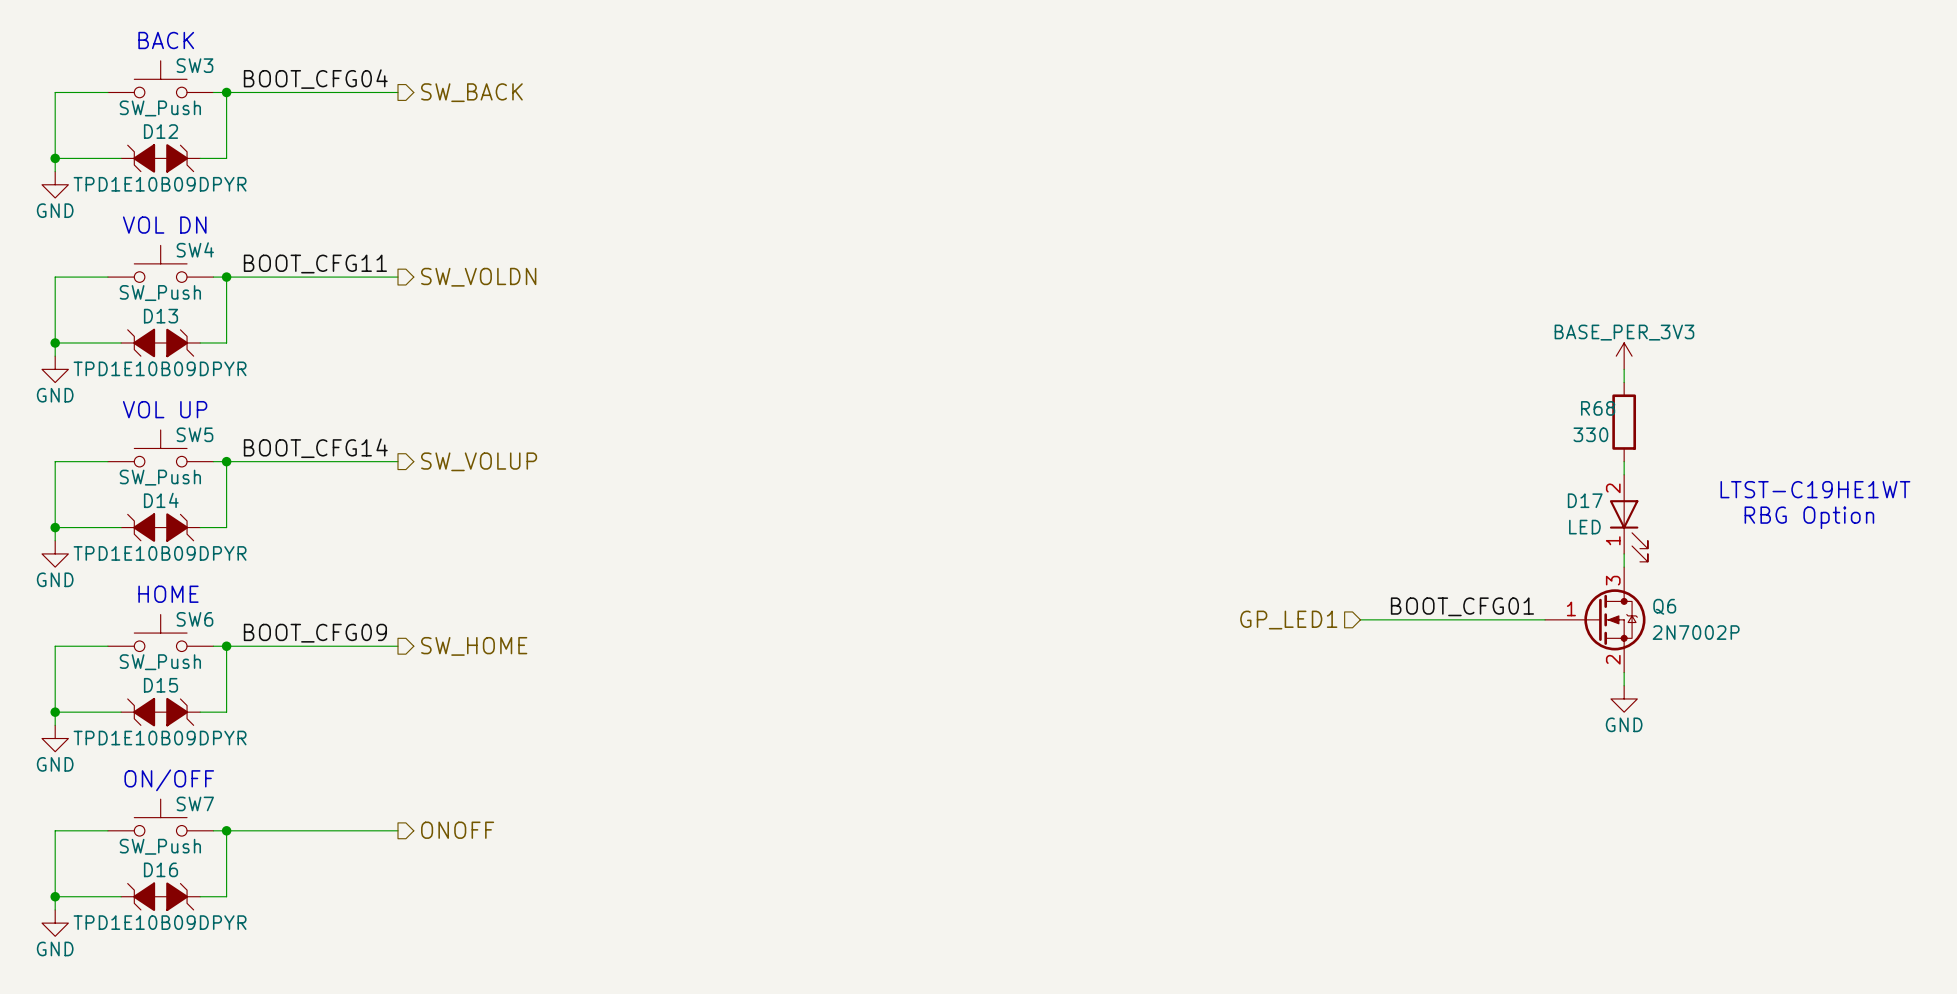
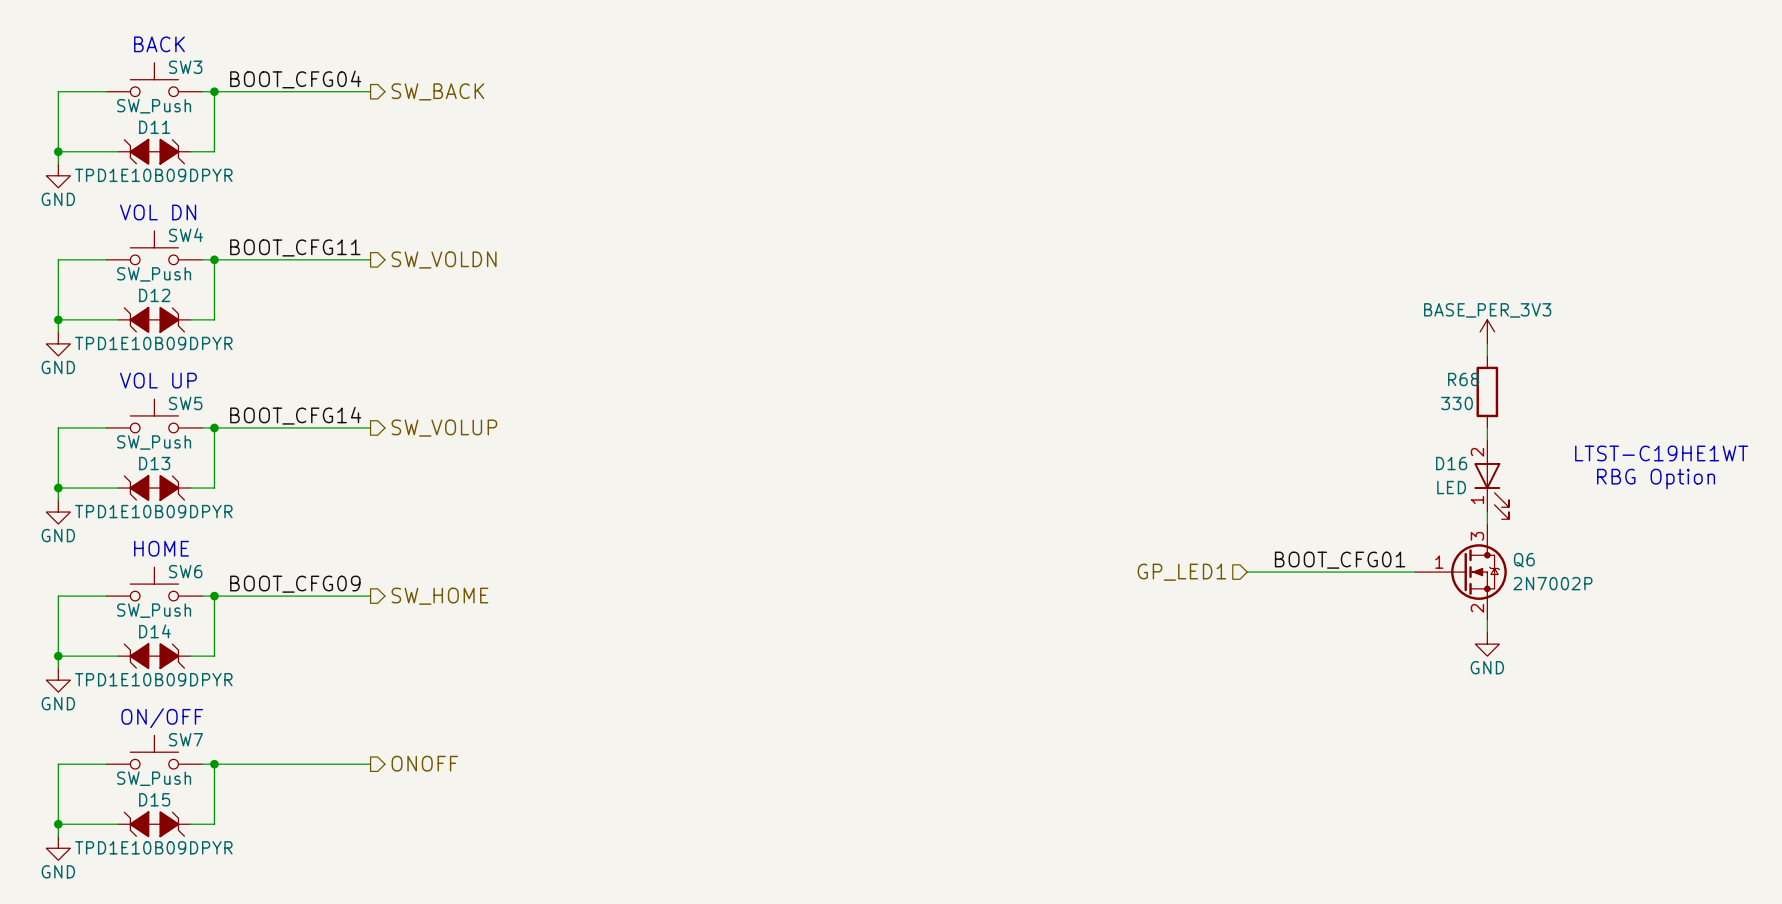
D12 name: D12 (160, 131) -> D11 (154, 127)
D13 name: D13 (160, 316) -> D12 (154, 295)
D14 name: D14 (161, 500) -> D13 (154, 463)
D17 name: D17 (1585, 500) -> D16 (1451, 463)
D15 name: D15 (160, 685) -> D14 (154, 631)
D16 name: D16 (160, 869) -> D15 (154, 799)

